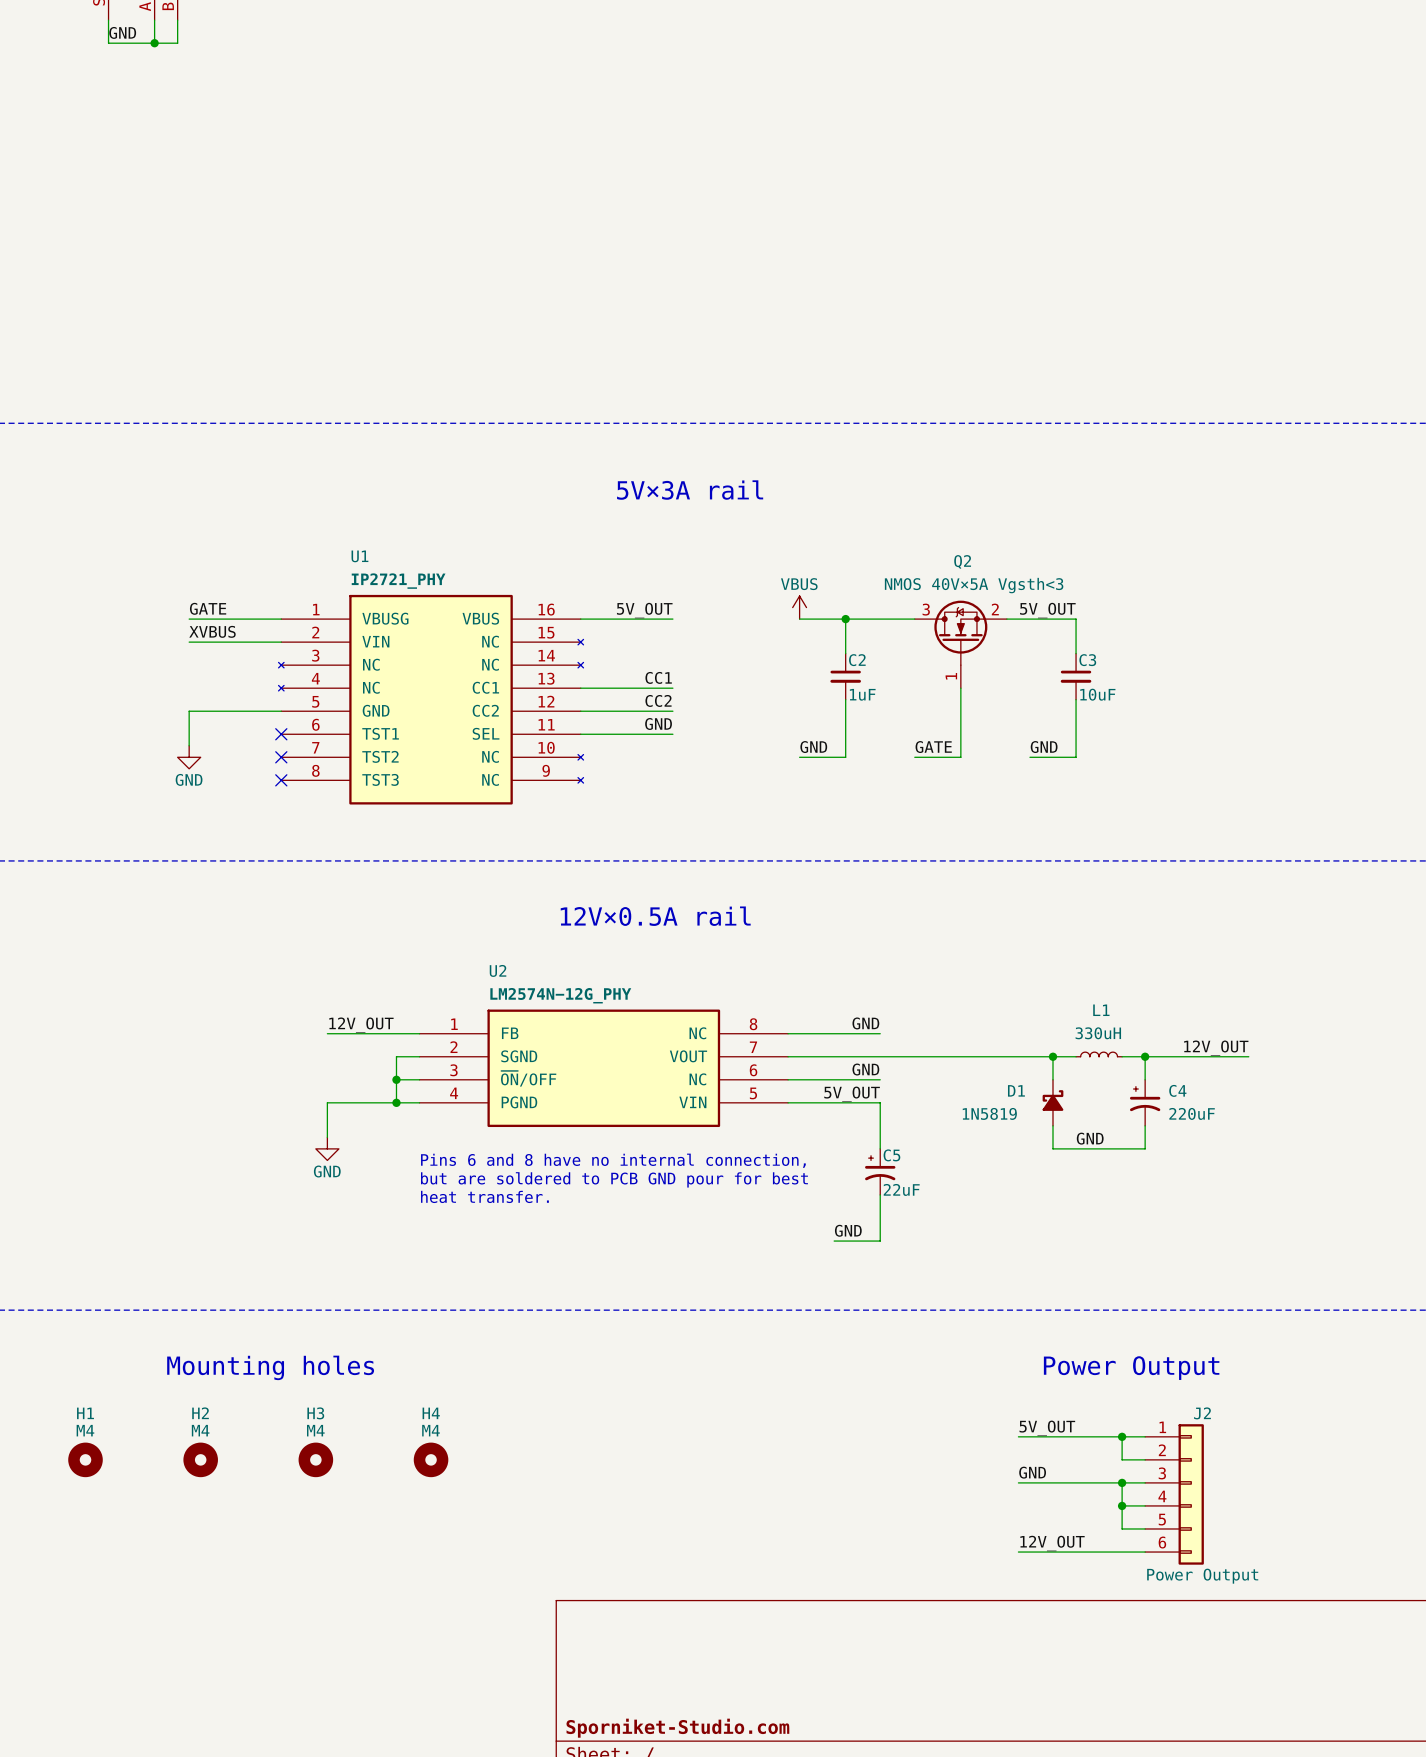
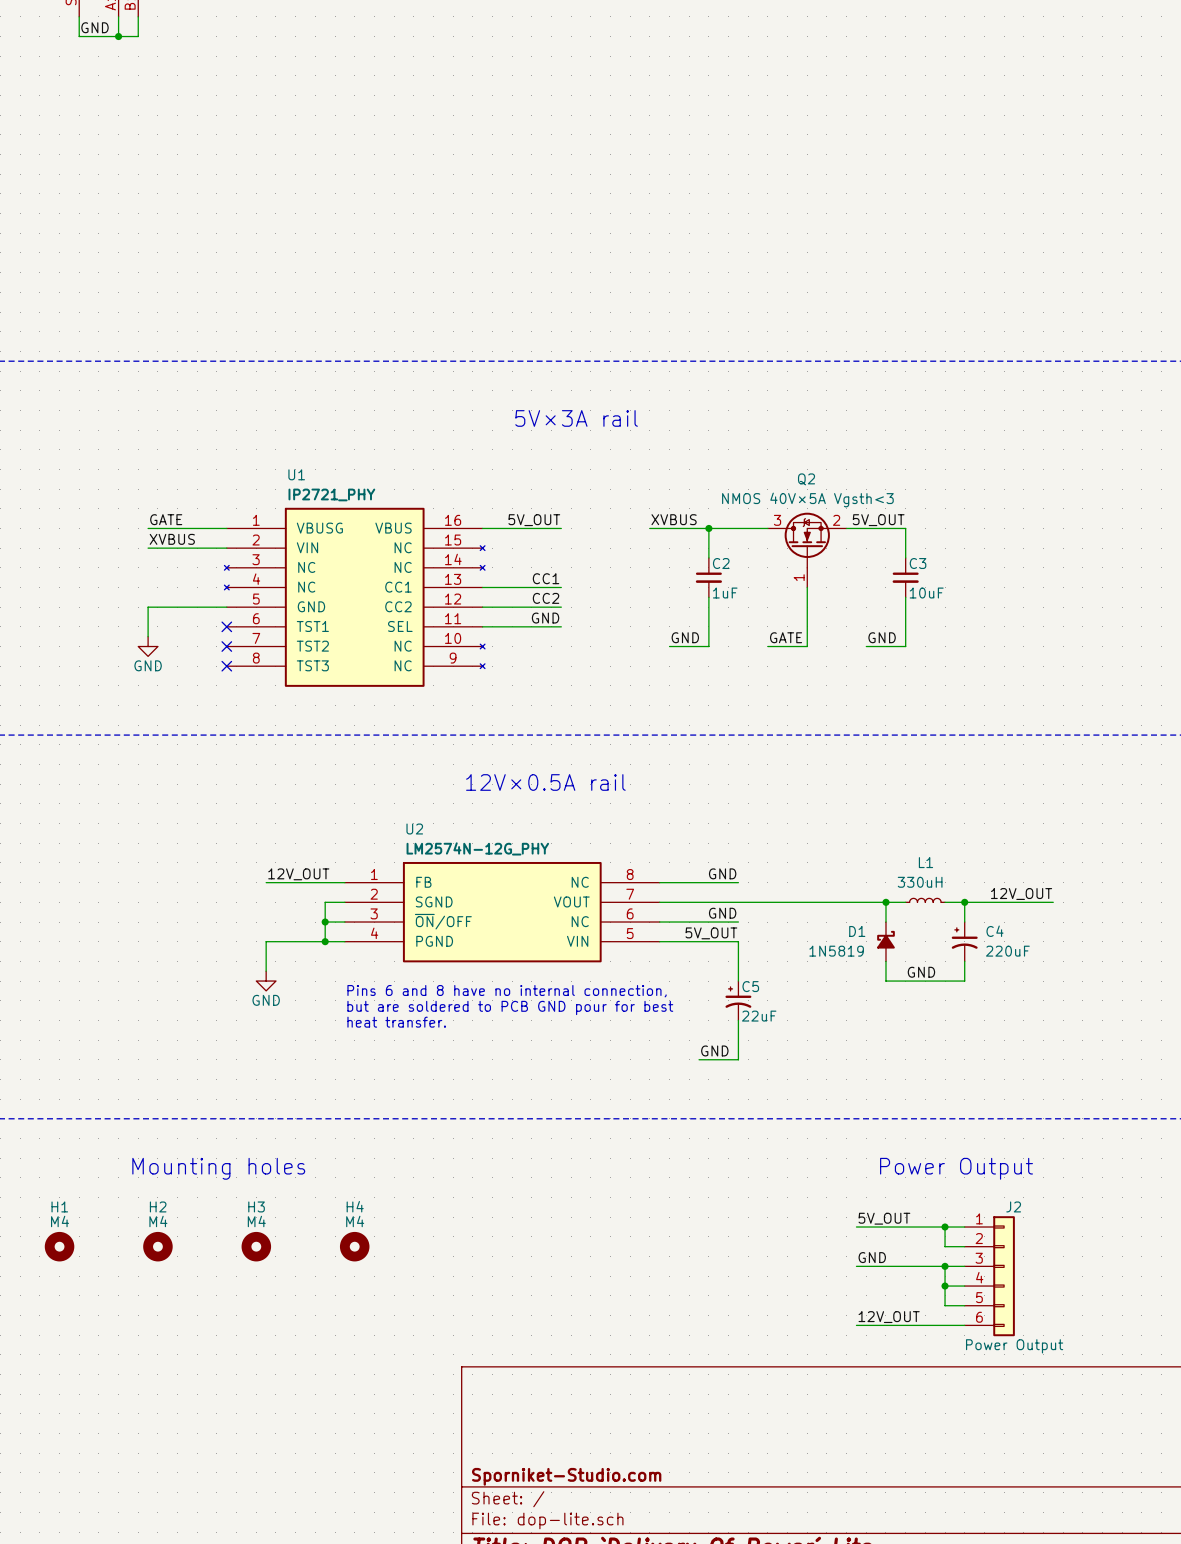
power symbol: VBUS (799, 607) -> none
label: none -> XVBUS (674, 519)
wire: none -> (649, 528) (669, 528)

